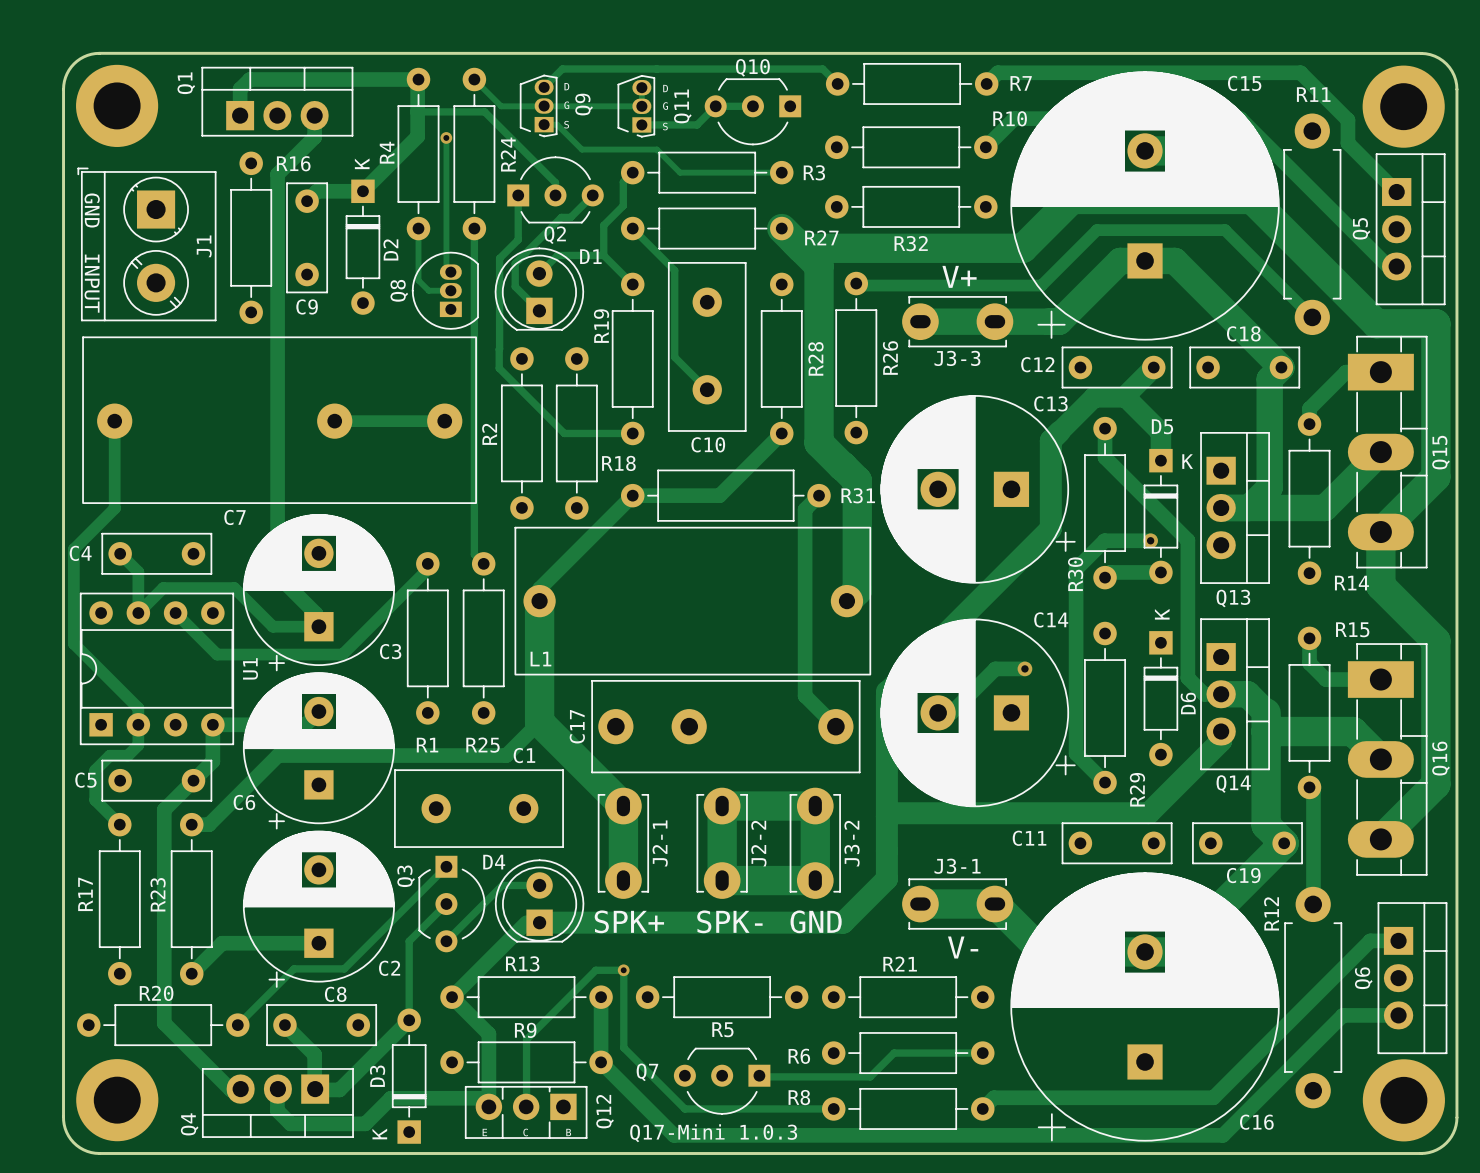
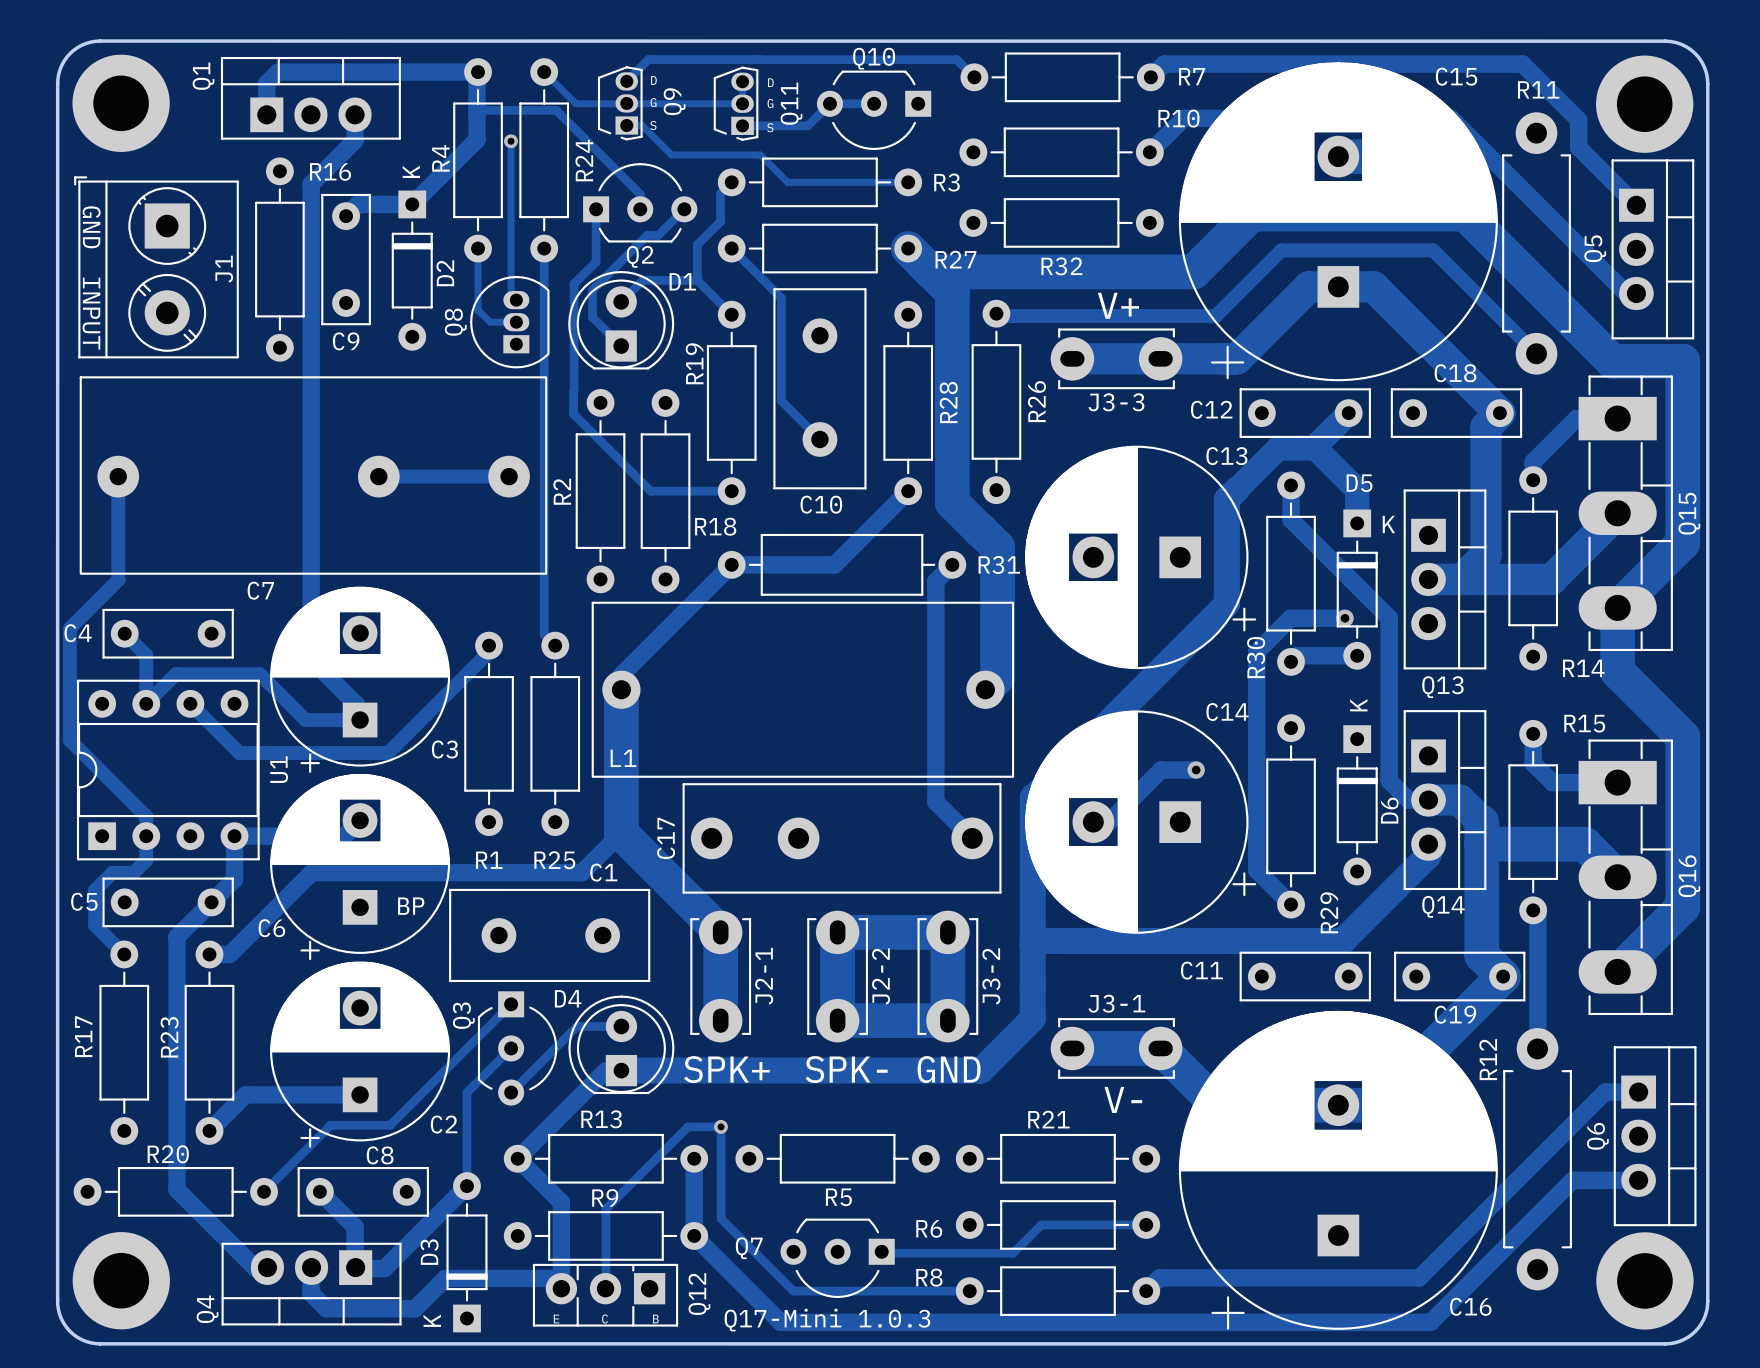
text: none -> BP (411, 906)

